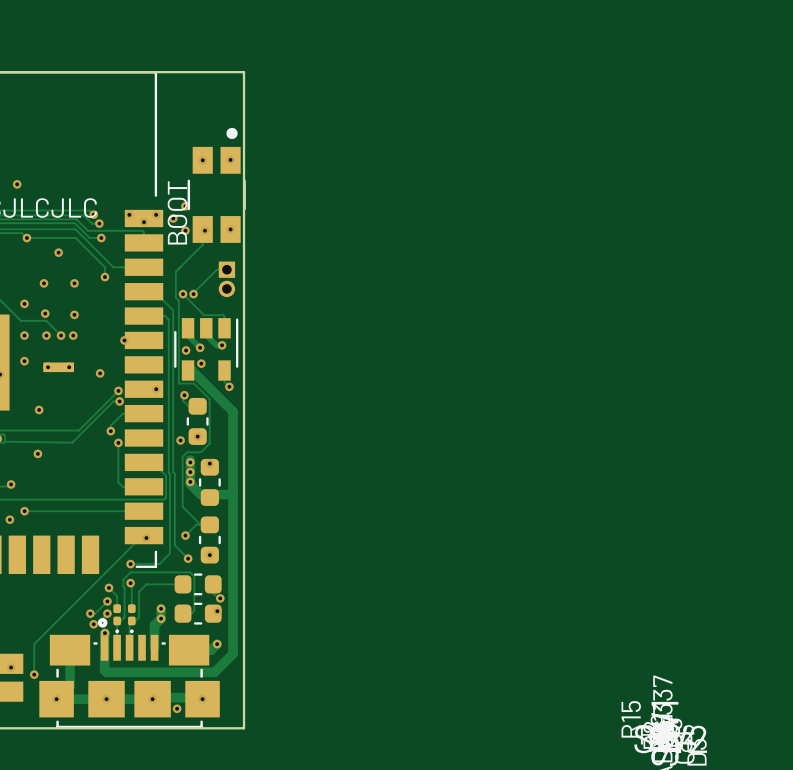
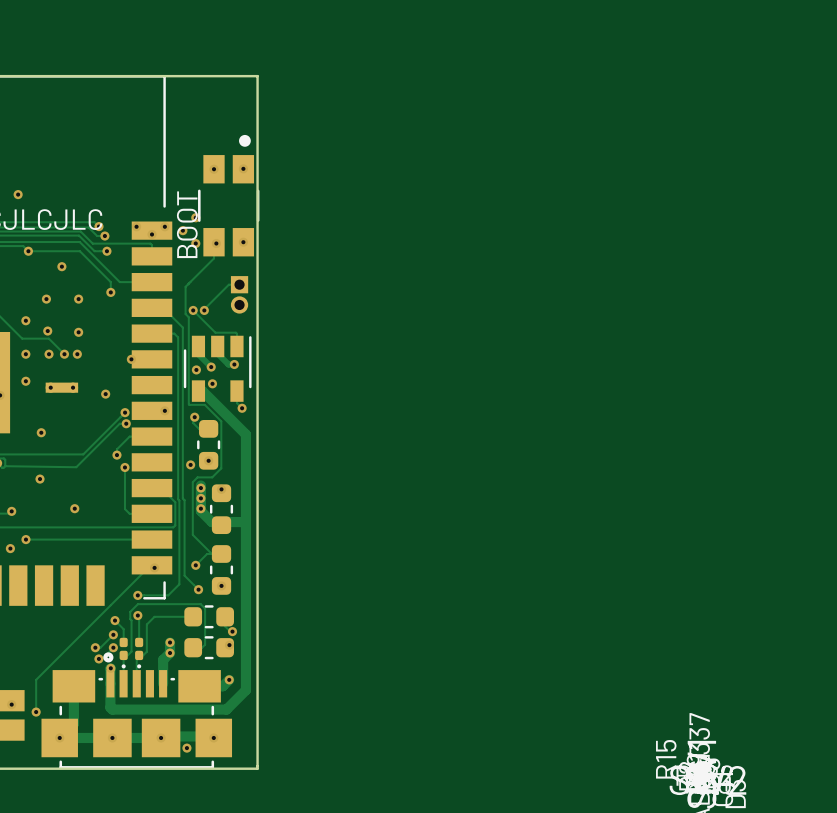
via: none -> (74, 508)

